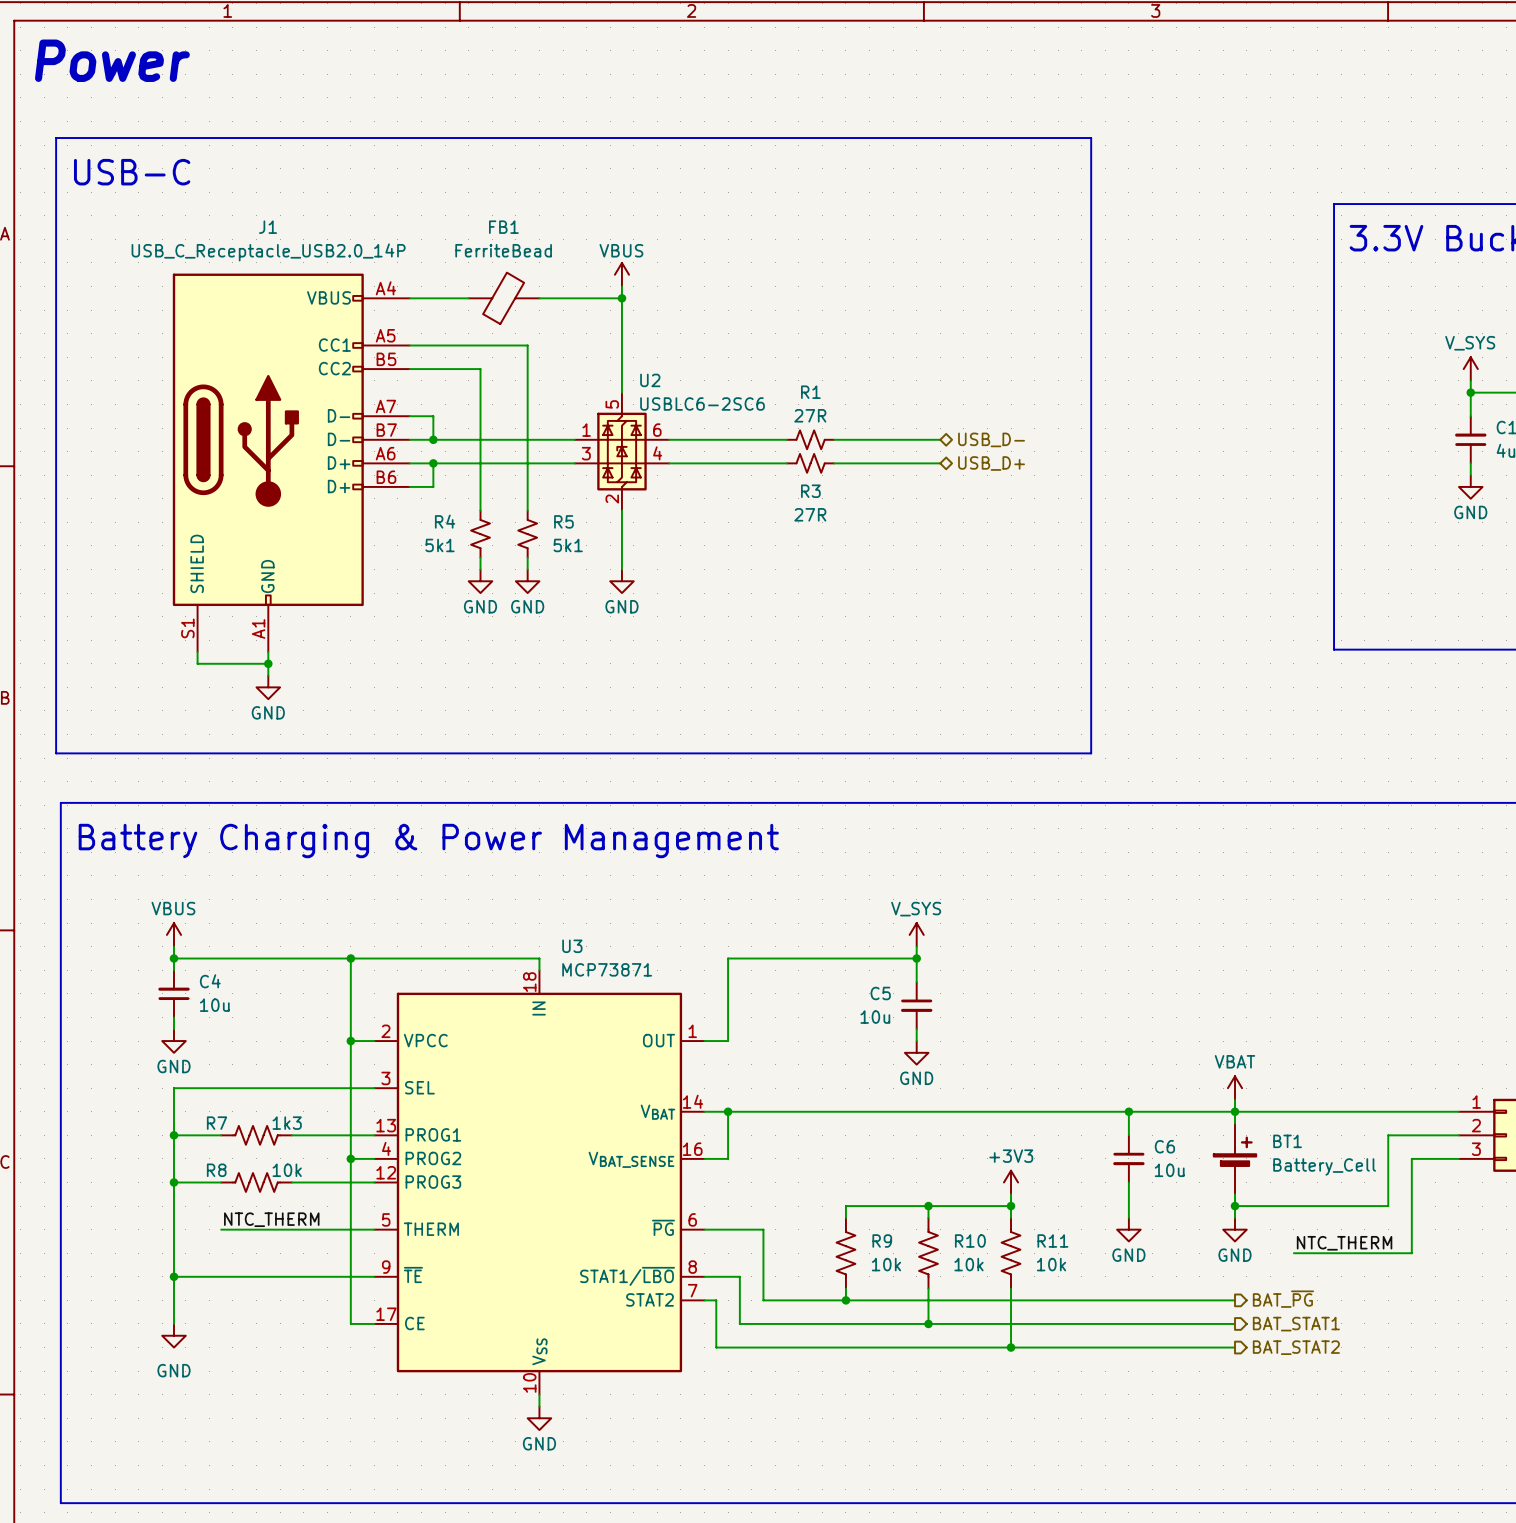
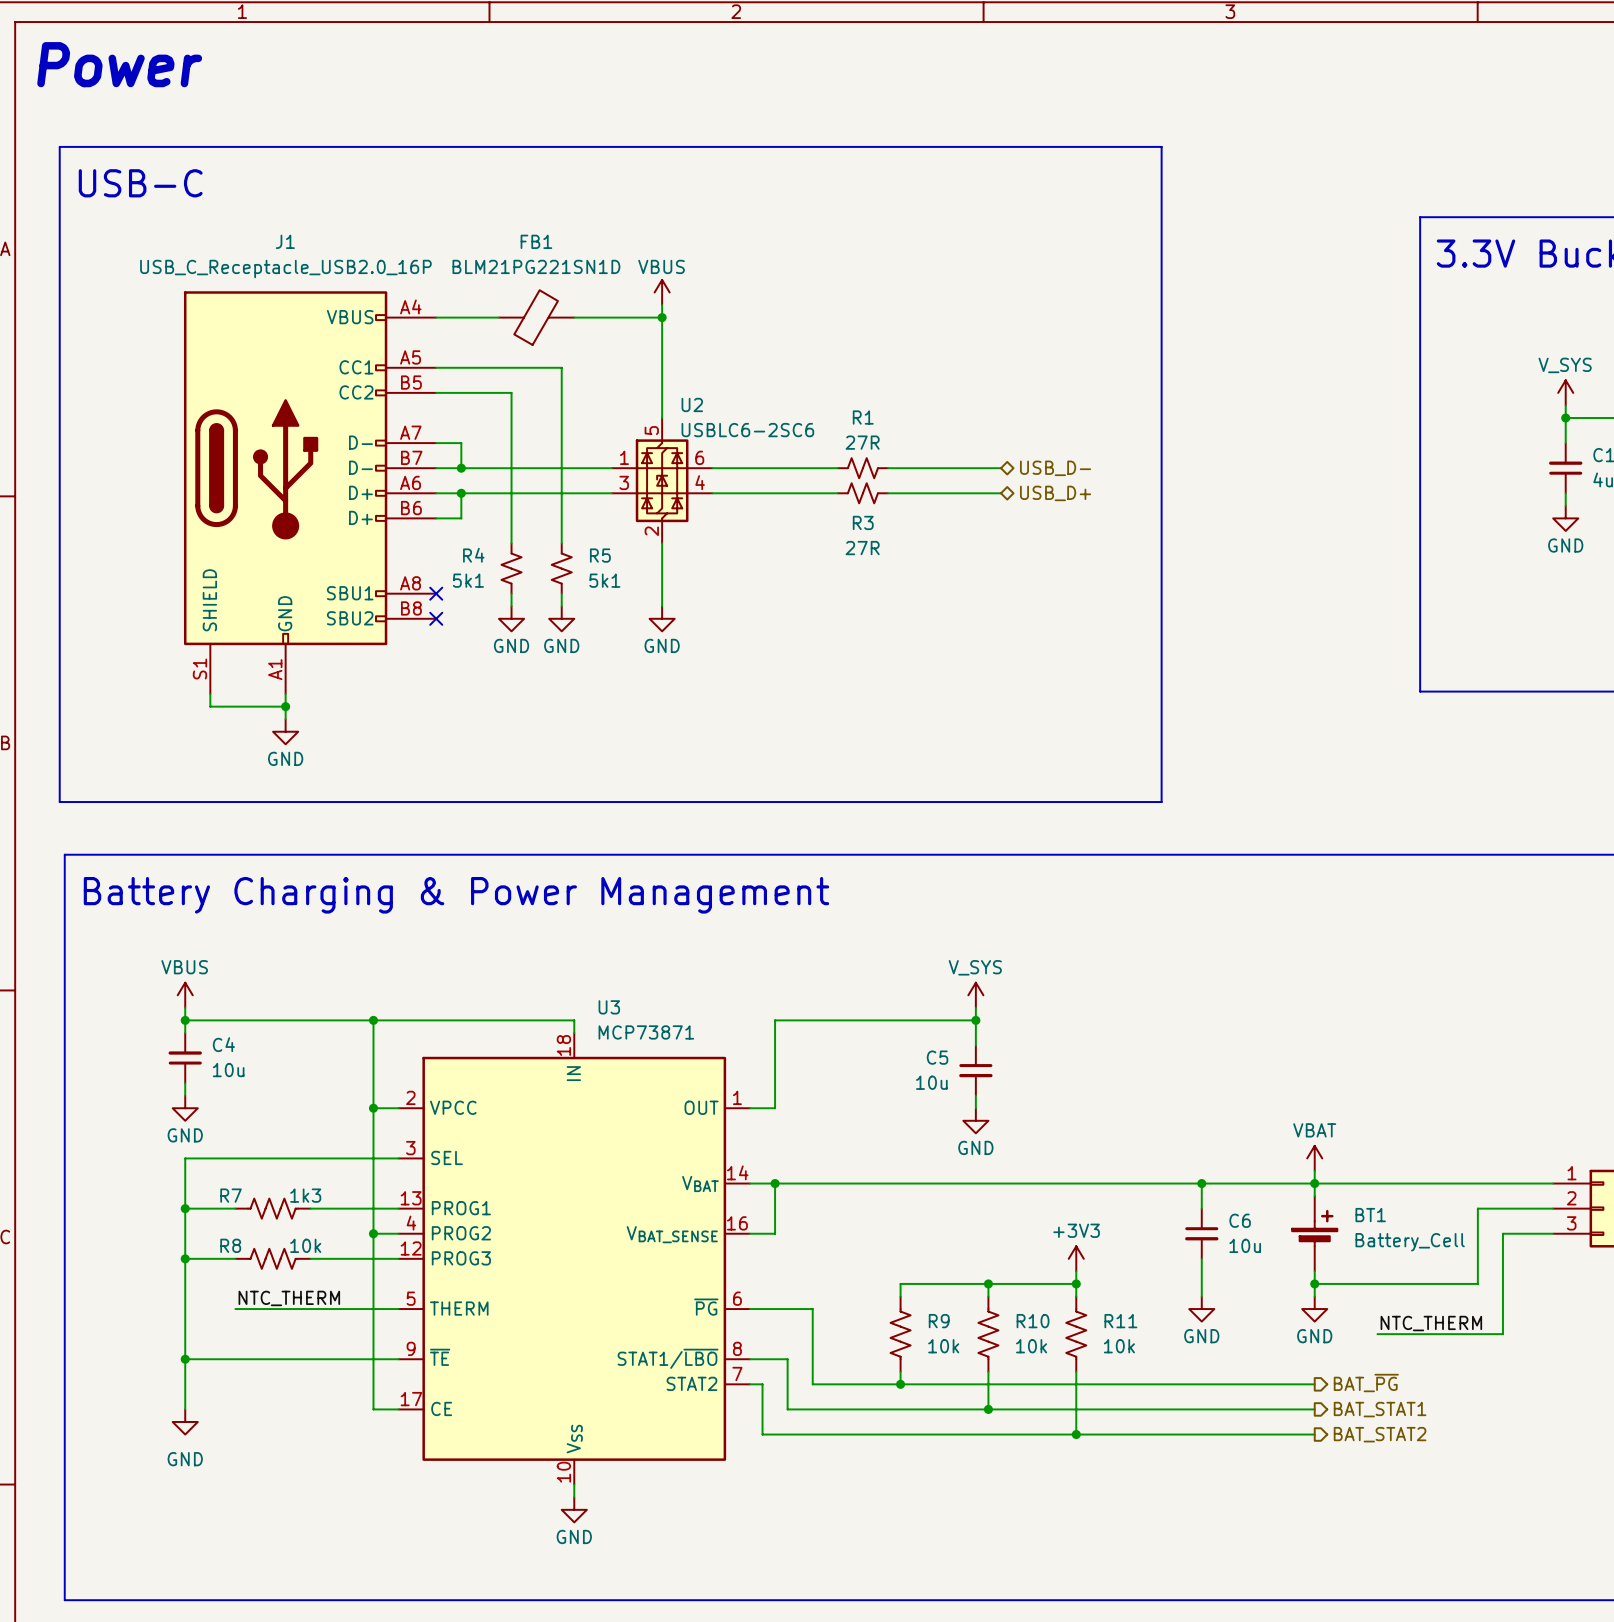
FB1 value: FerriteBead (503, 250) -> BLM21PG221SN1D (536, 266)
J1 value: USB_C_Receptacle_USB2.0_14P (268, 252) -> USB_C_Receptacle_USB2.0_16P (285, 269)
J1 symbol: [172, 273, 410, 653] -> [183, 291, 437, 695]
no-connect mark: none -> (436, 593)
no-connect mark: none -> (436, 618)

